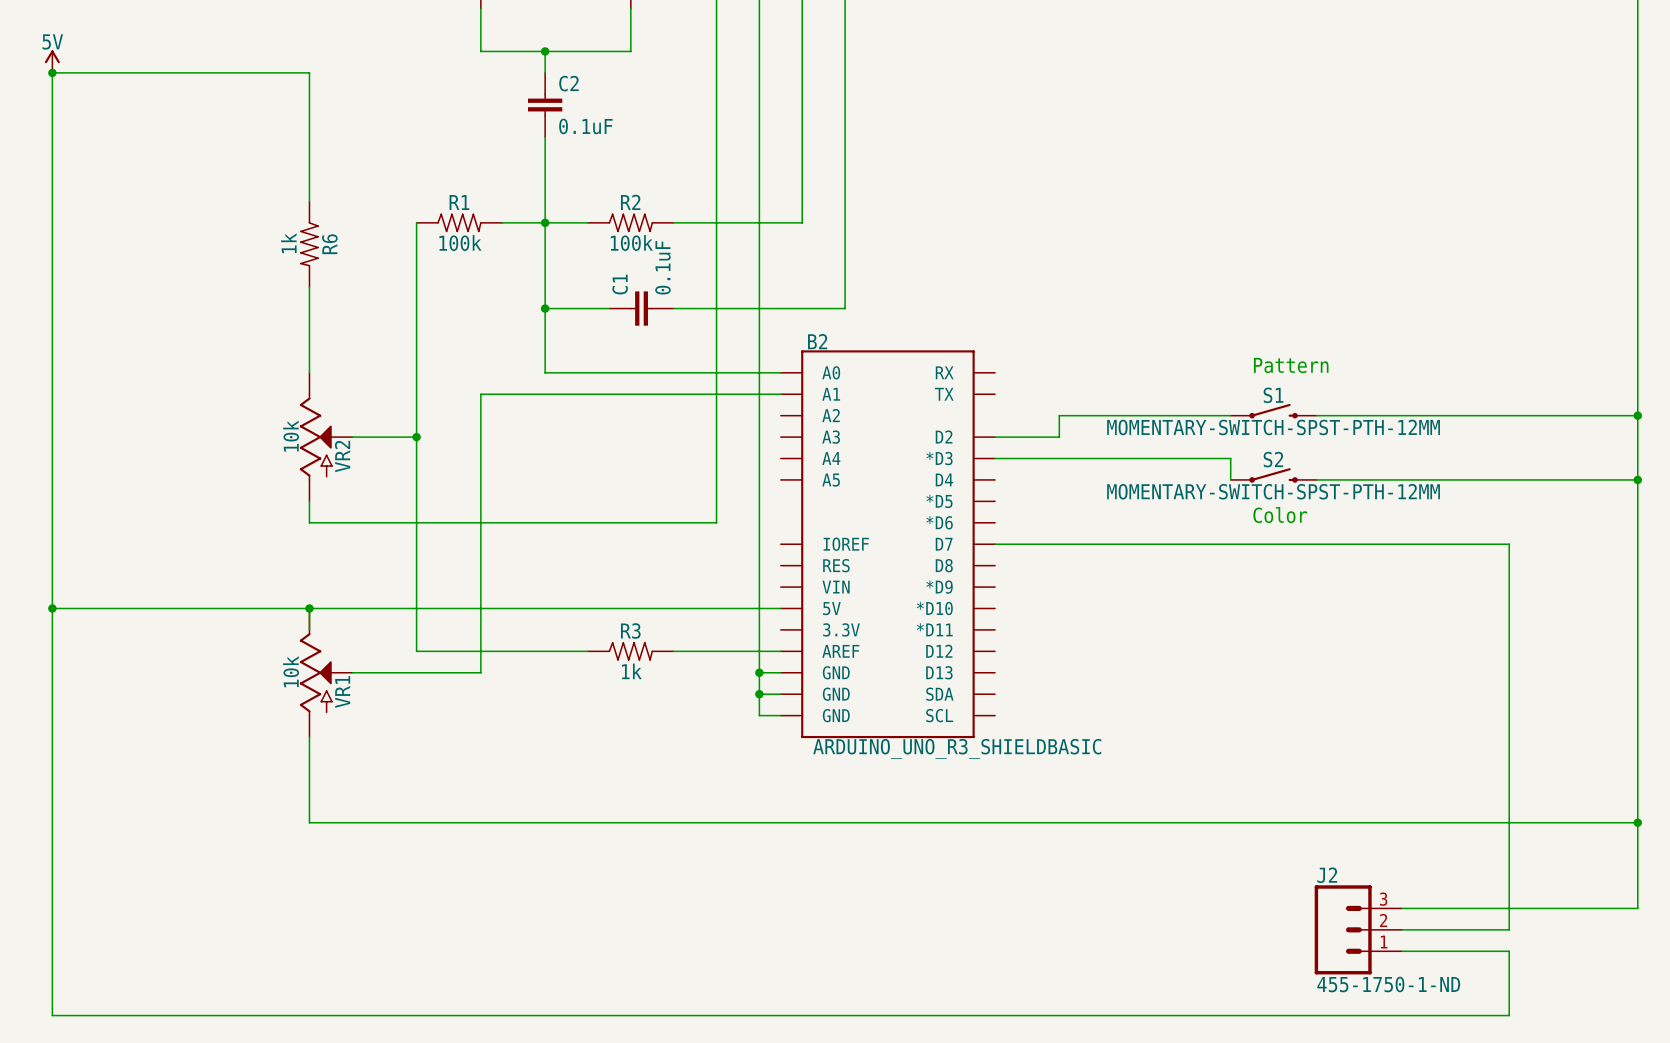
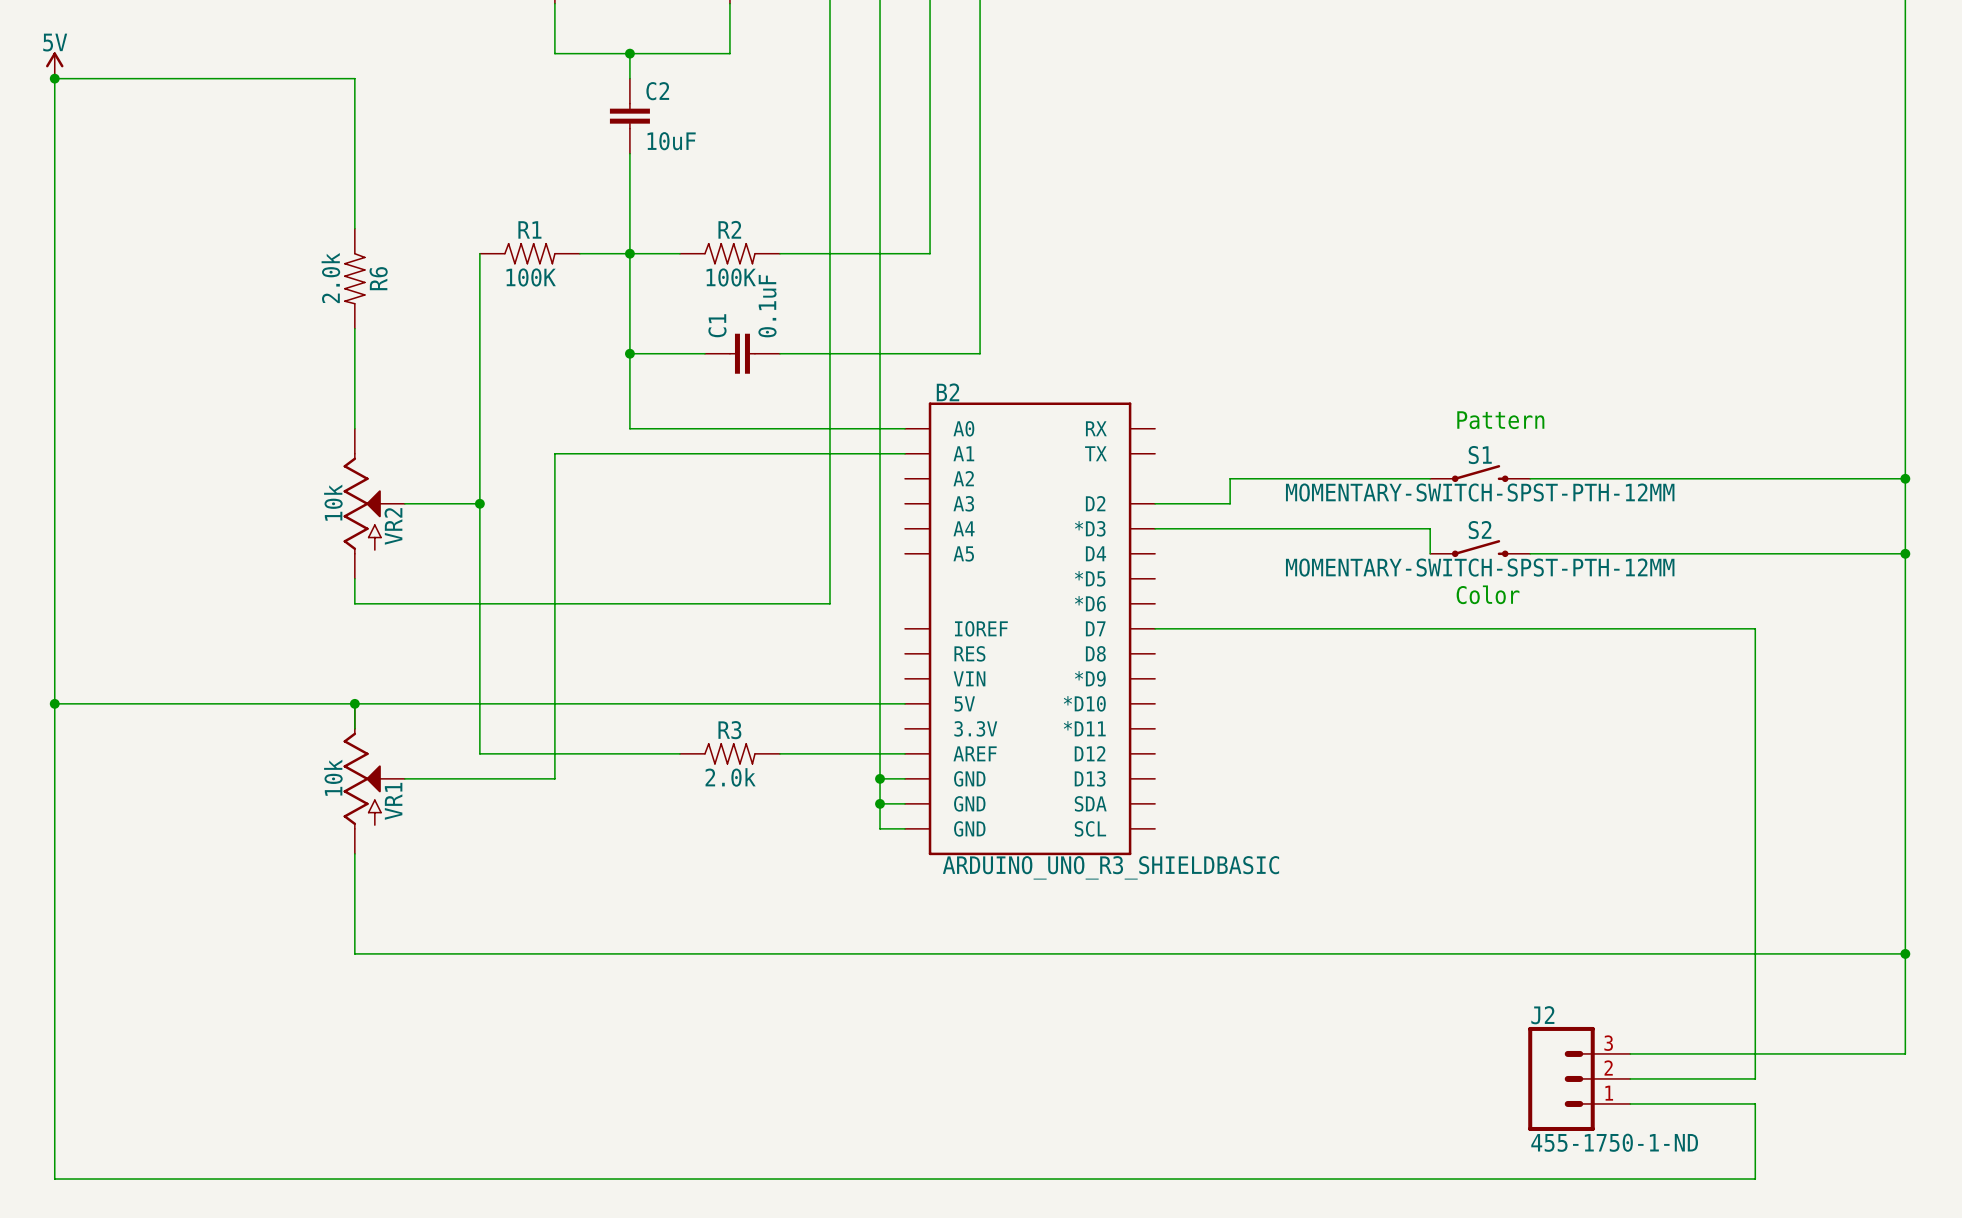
C2 value: 0.1uF (585, 126) -> 10uF (671, 141)
R6 value: 1k (288, 243) -> 2.0k (330, 278)
R1 value: 100k (460, 243) -> 100K (531, 277)
R2 value: 100k (631, 243) -> 100K (731, 277)
R3 value: 1k (631, 671) -> 2.0k (730, 777)

